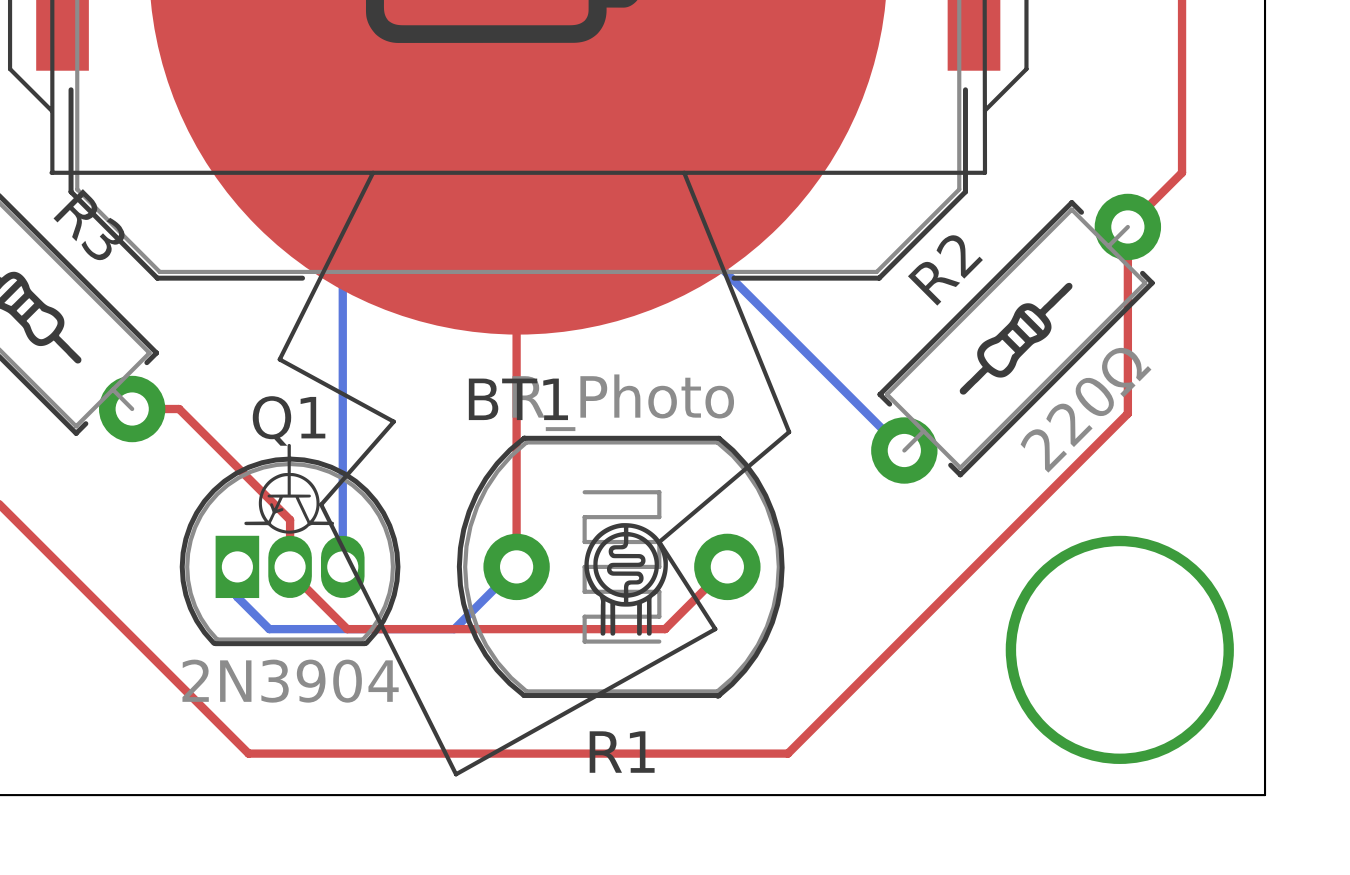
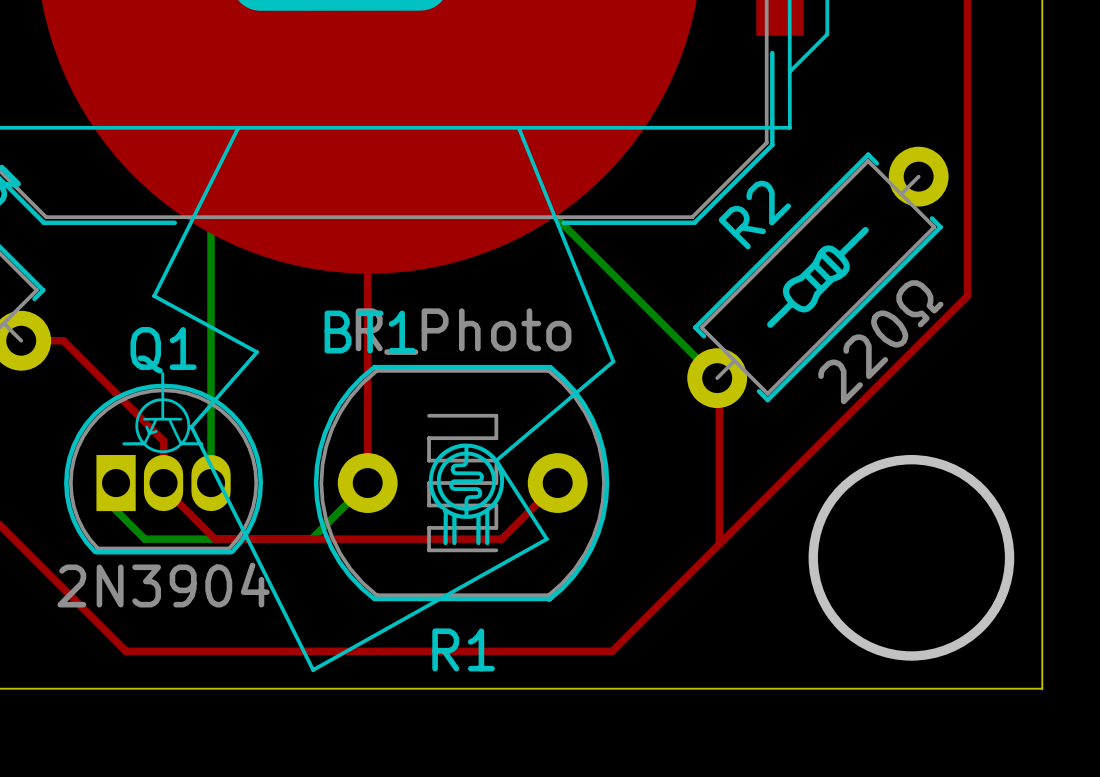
top track: (1182, 172) (1127, 226) (1127, 413) -> (967, 127) (967, 296) (918, 344)
top track: none -> (719, 376) (719, 543)

